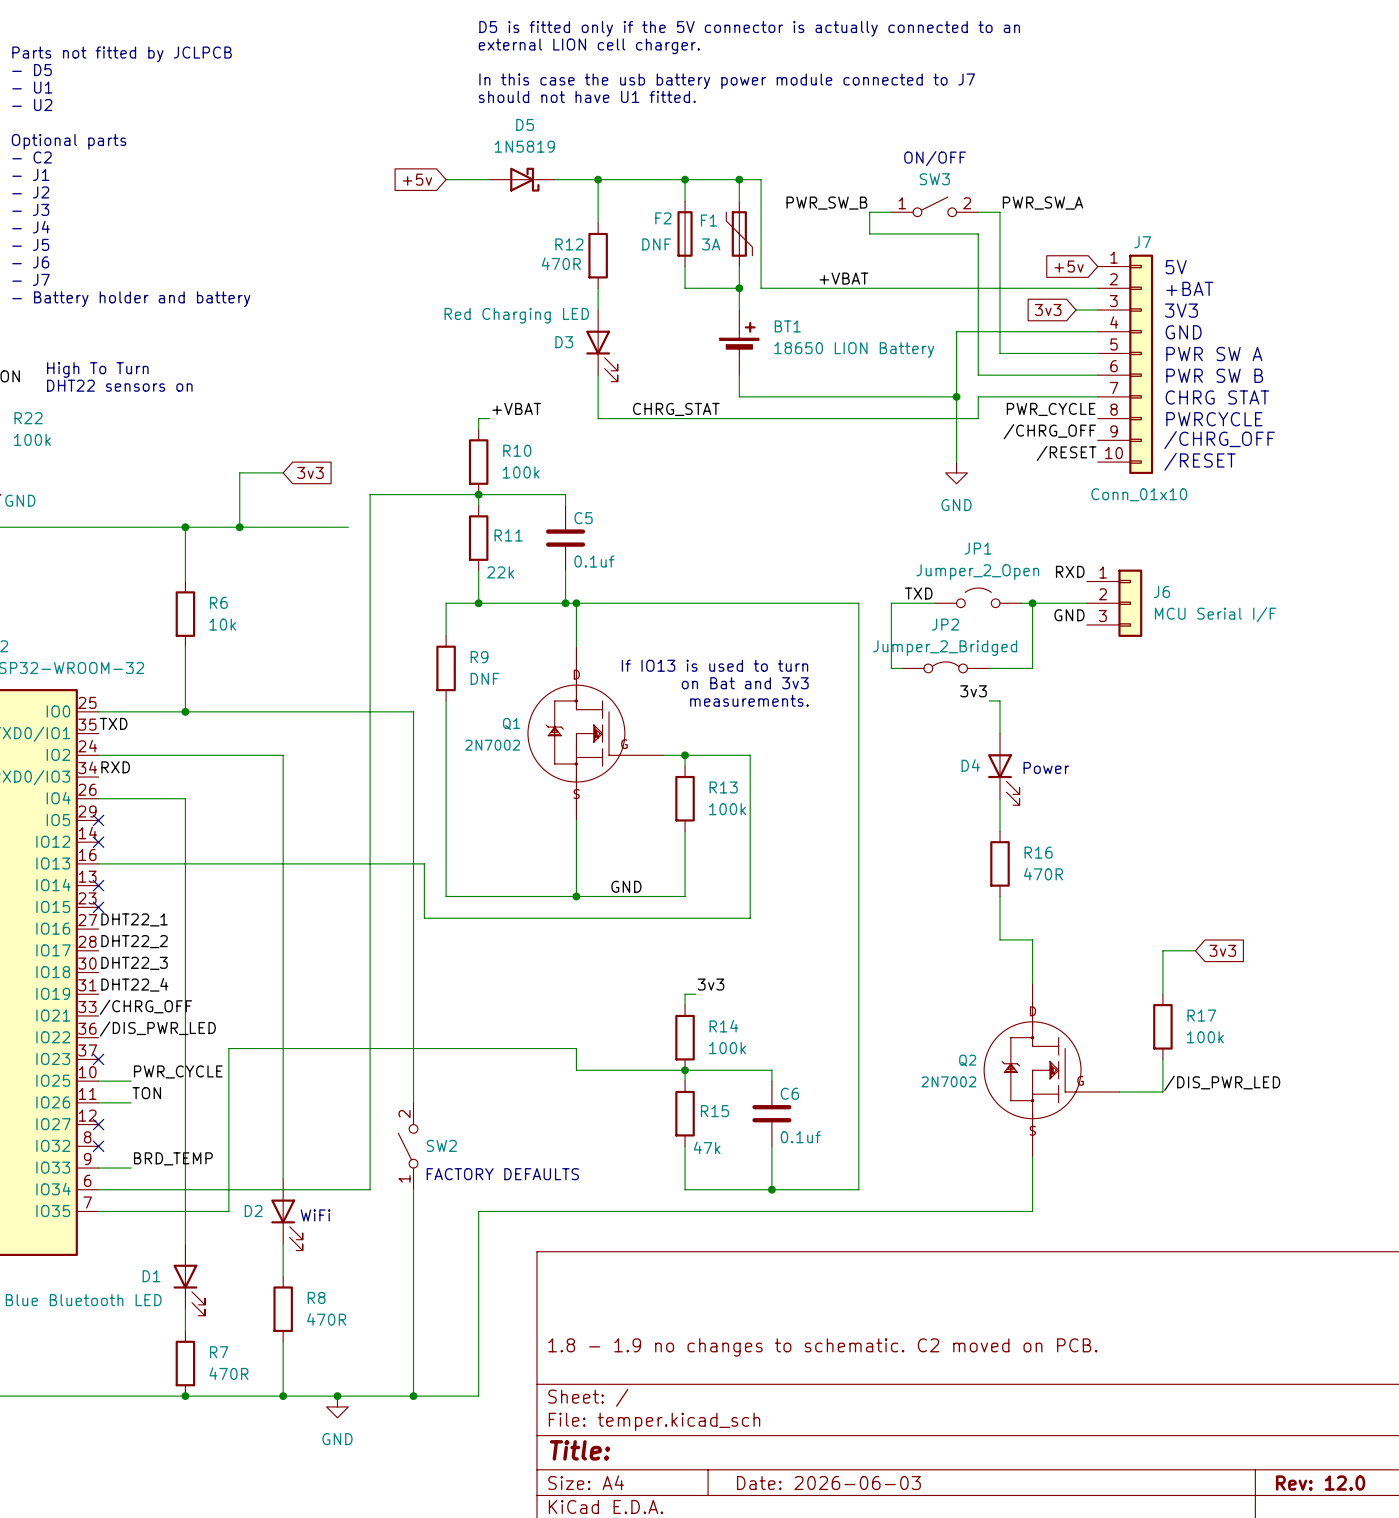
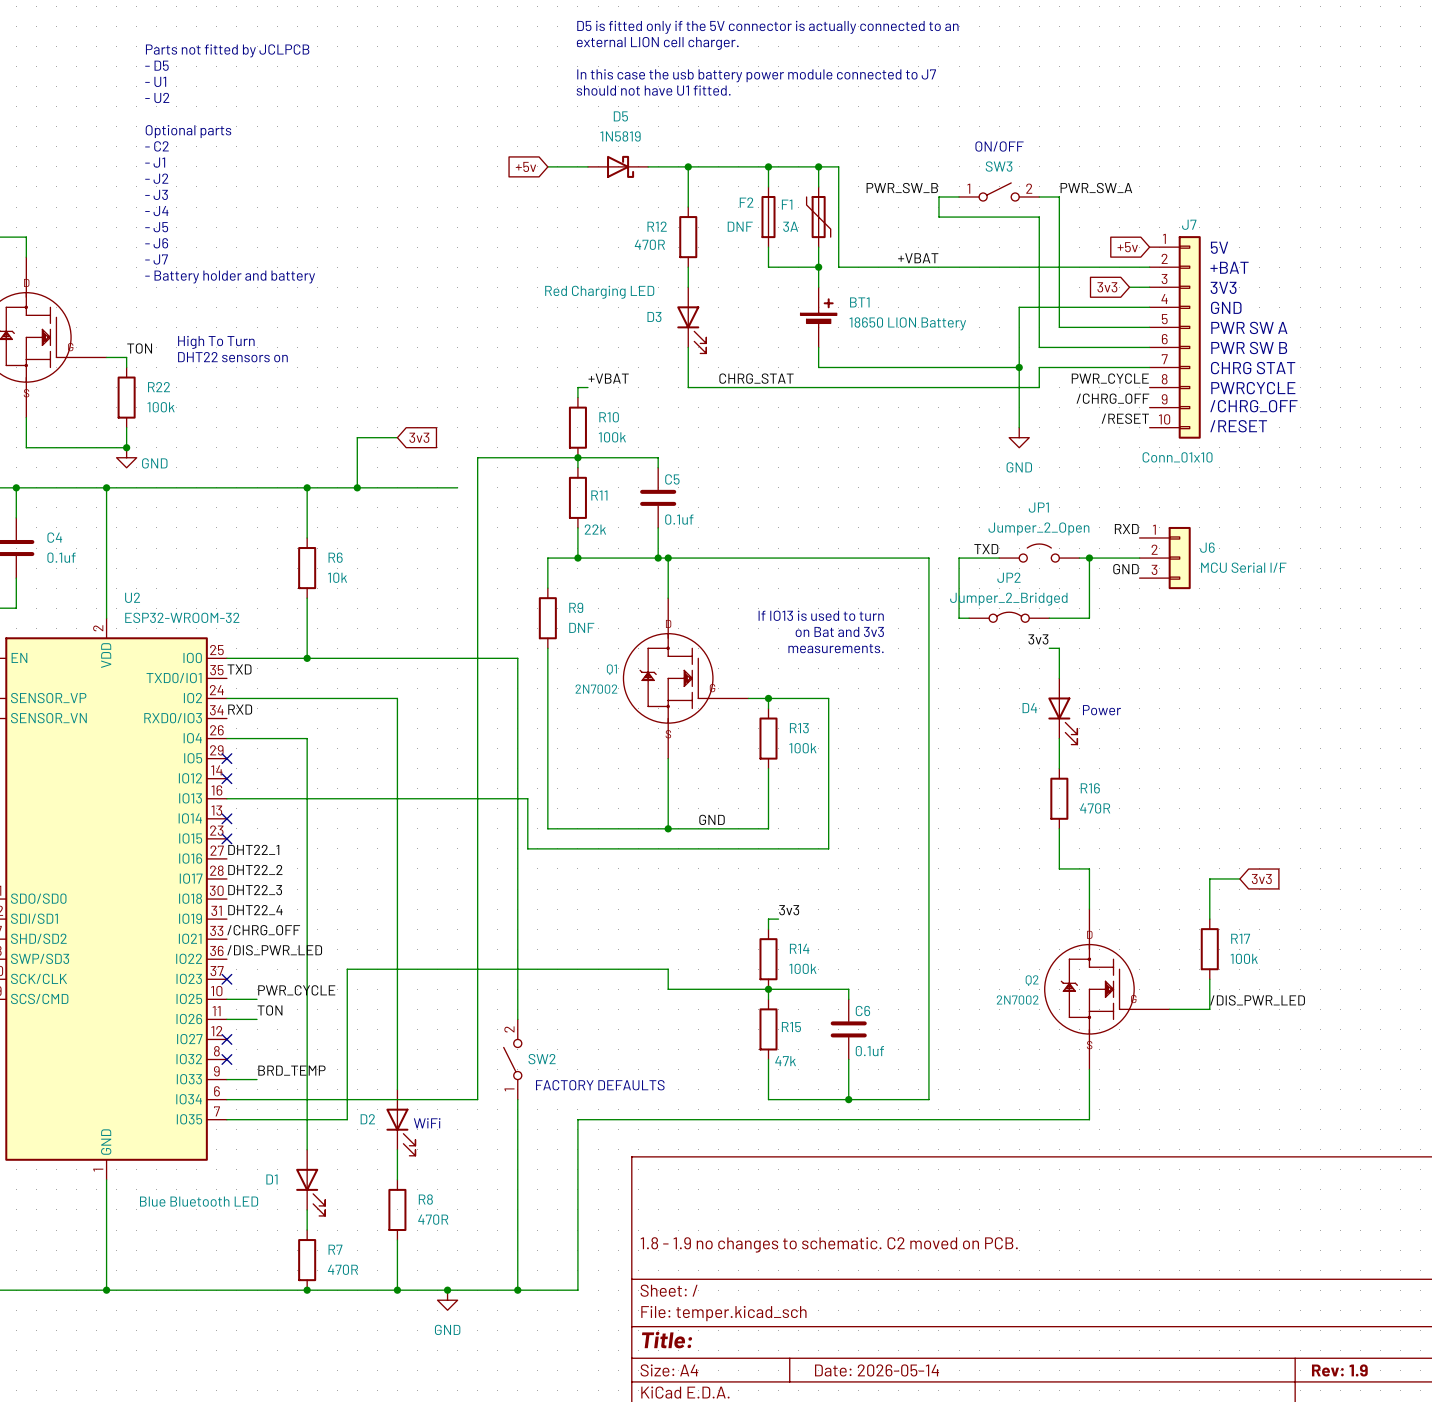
title block: Date: 2026-06-03 (828, 1483) -> Date: 2026-05-14 (877, 1370)
title block: Rev: 12.0 (1320, 1483) -> Rev: 1.9 (1339, 1370)

